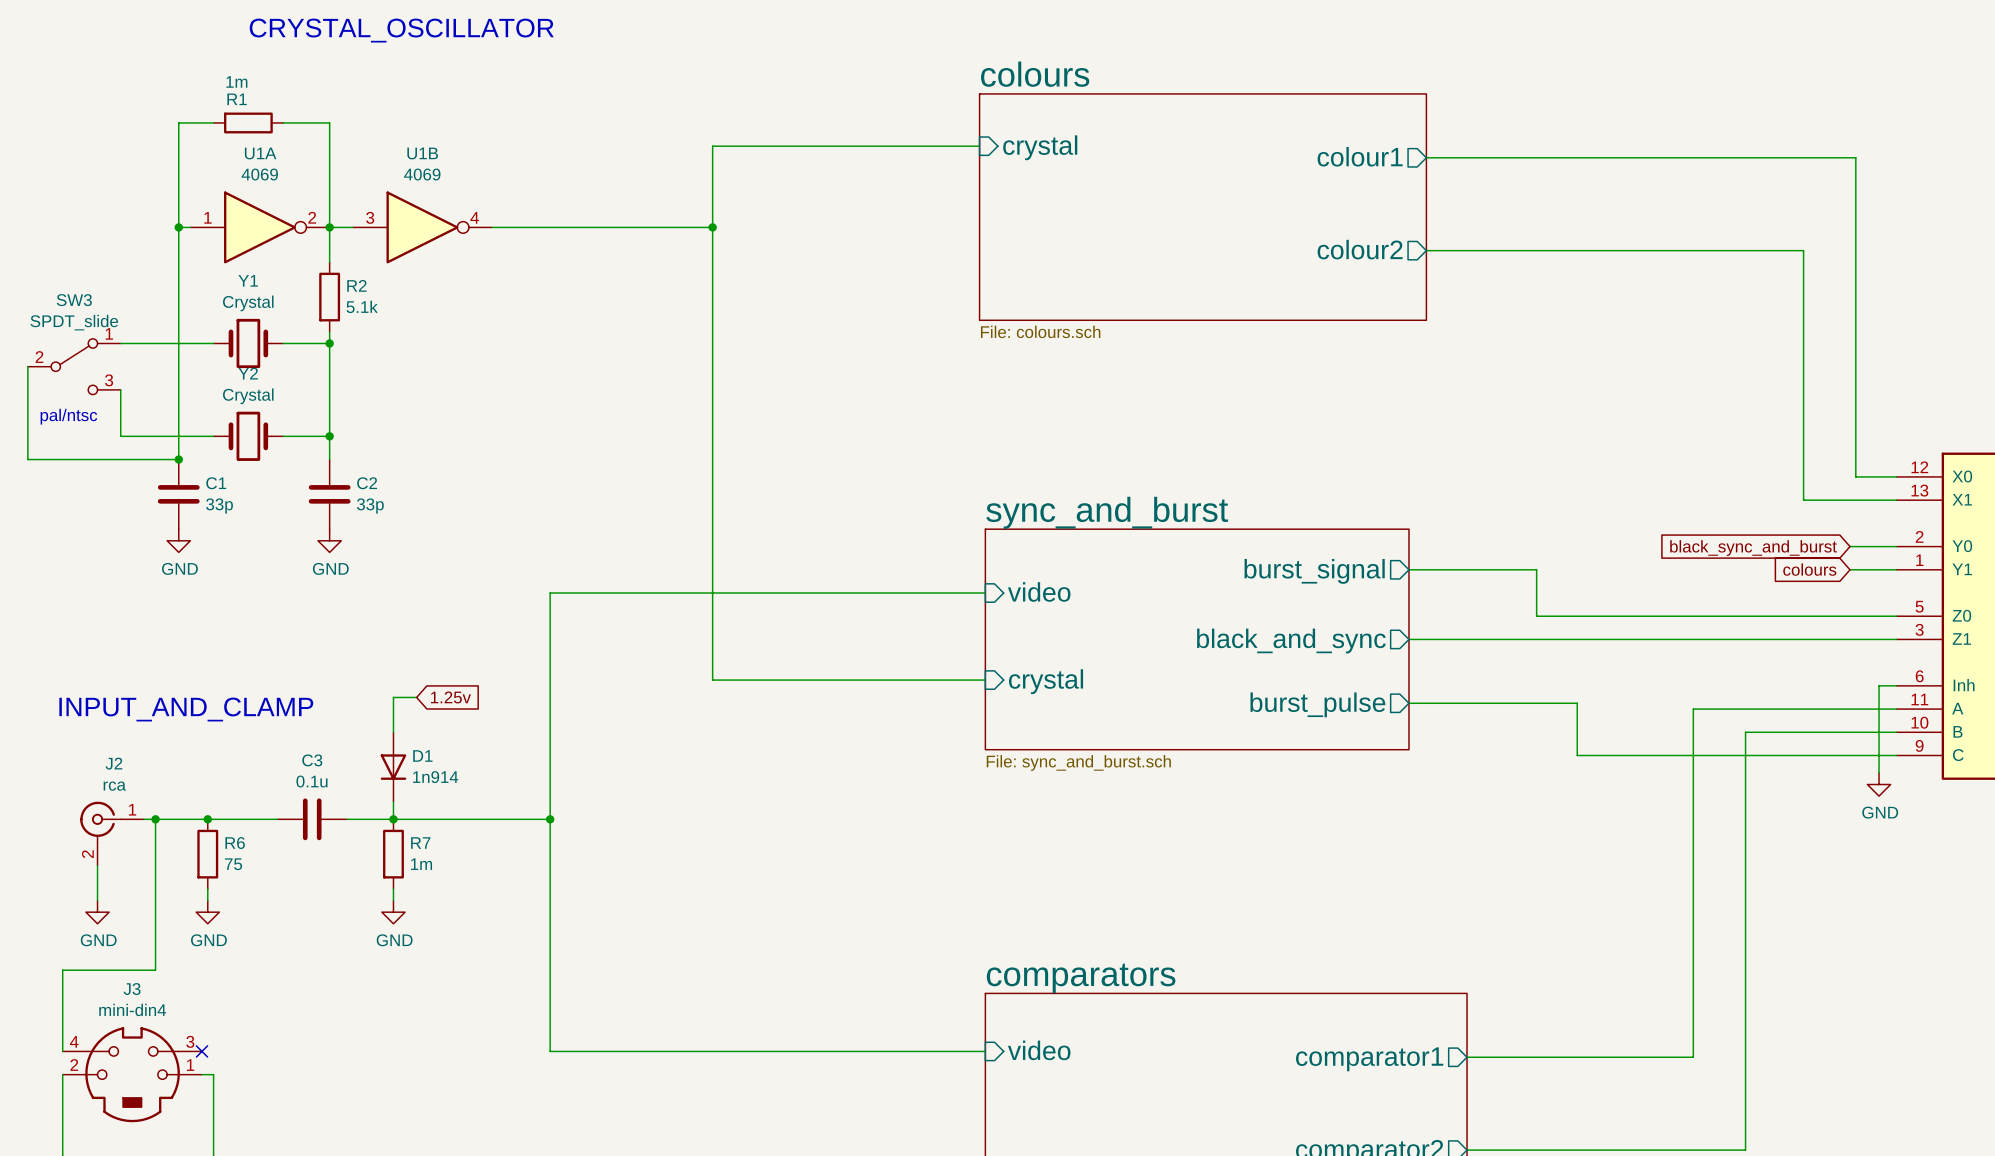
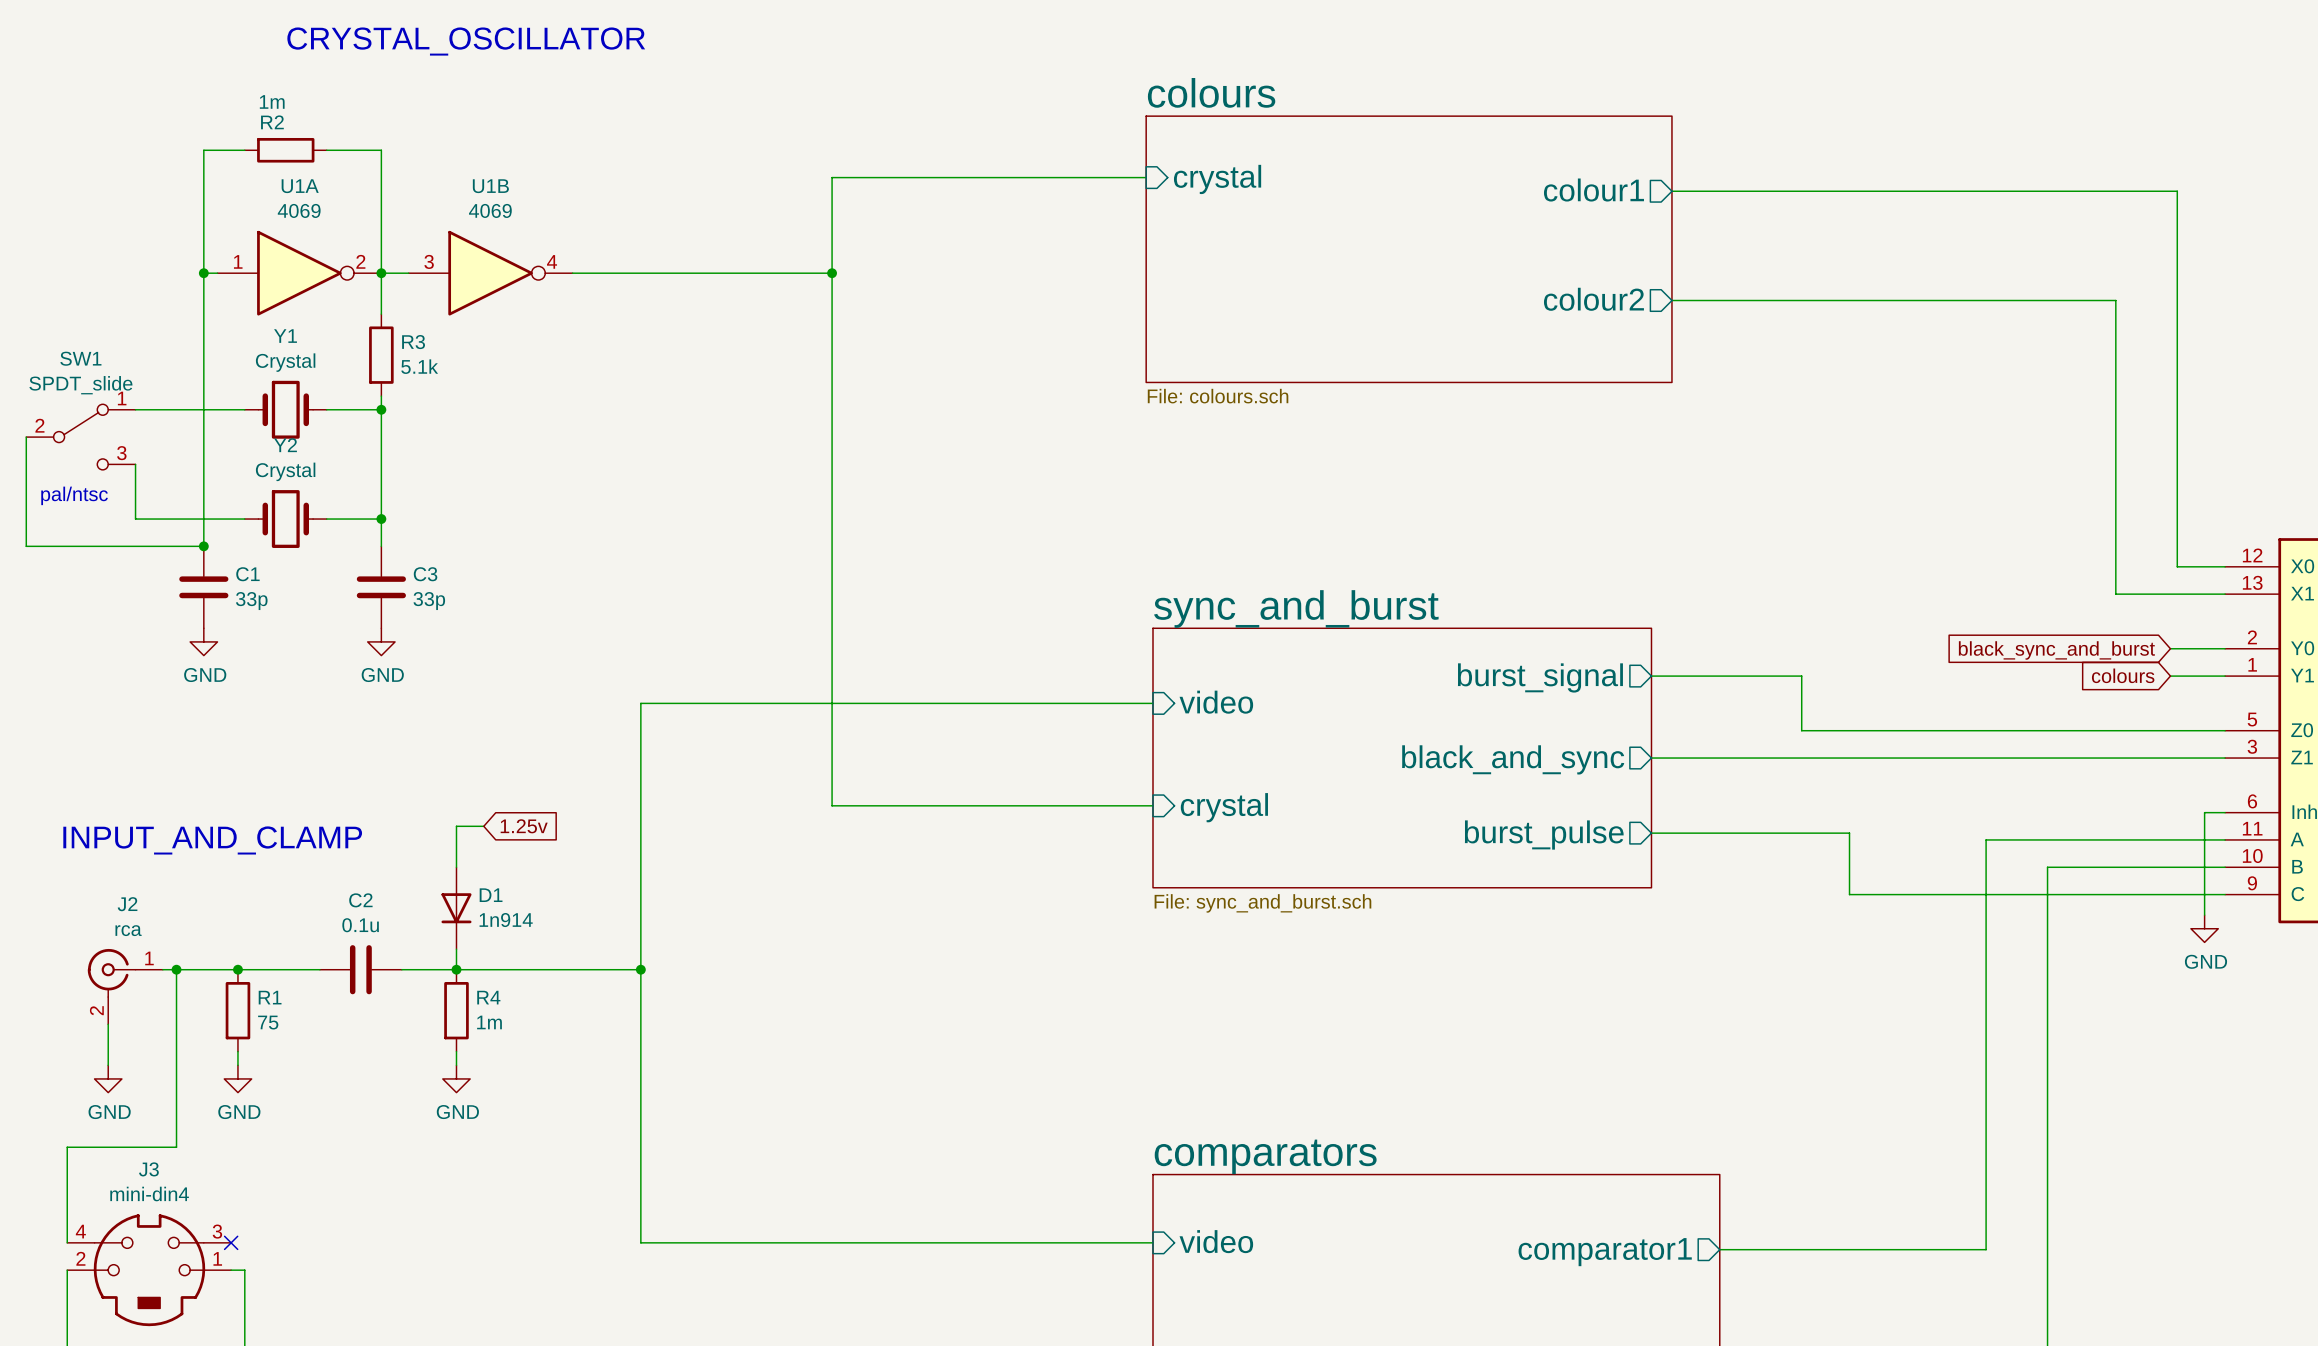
R1 name: R1 (237, 99) -> R2 (272, 122)
R2 name: R2 (356, 285) -> R3 (413, 342)
SW3 name: SW3 (74, 300) -> SW1 (80, 358)
C2 name: C2 (367, 483) -> C3 (425, 574)
C3 name: C3 (312, 760) -> C2 (360, 900)
R6 name: R6 (235, 843) -> R1 (270, 997)
R7 name: R7 (420, 843) -> R4 (488, 997)

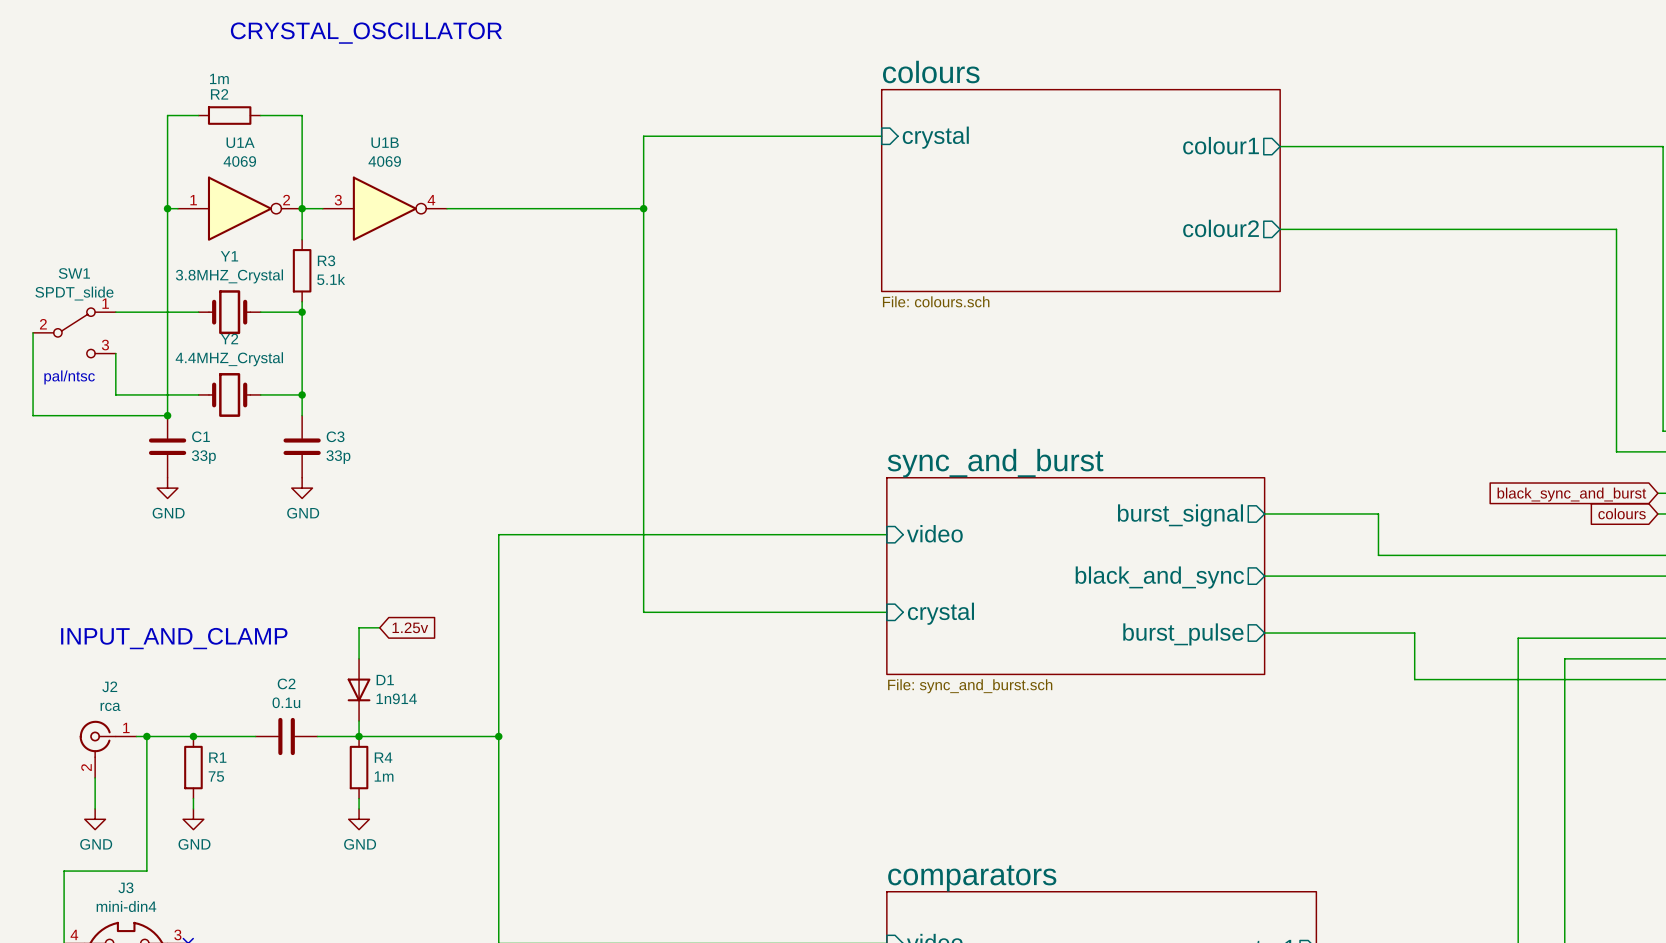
Y1 value: Crystal (285, 362) -> 3.8MHZ_Crystal (229, 276)
Y2 value: Crystal (285, 471) -> 4.4MHZ_Crystal (229, 359)

